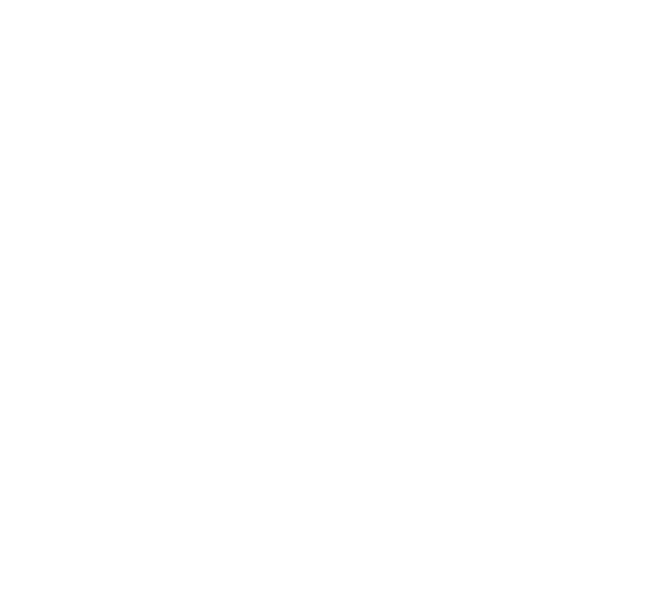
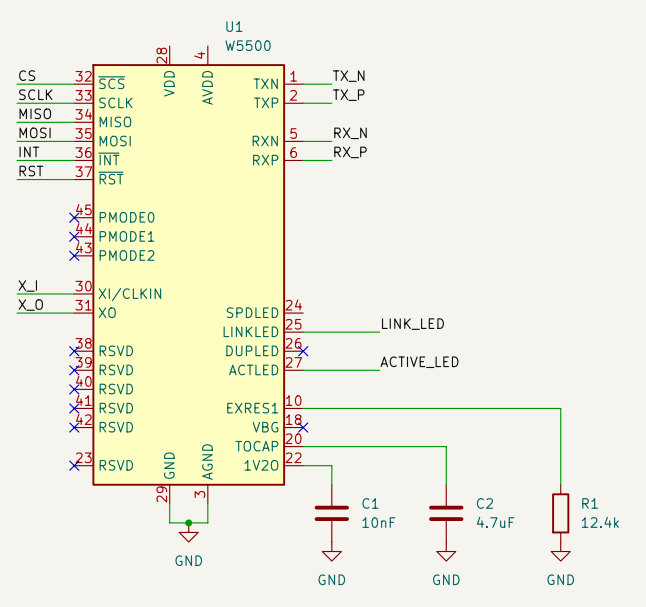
label: none -> CS (27, 75)
label: none -> TX_N (348, 76)
wire: none -> (17, 84) (74, 84)
wire: none -> (303, 84) (331, 84)
label: none -> SCLK (35, 94)
label: none -> TX_P (348, 95)
wire: none -> (17, 103) (74, 103)
wire: none -> (303, 103) (331, 103)
label: none -> MISO (35, 113)
wire: none -> (17, 122) (74, 122)
label: none -> MOSI (35, 132)
label: none -> RX_N (350, 133)
wire: none -> (17, 141) (74, 141)
wire: none -> (303, 141) (331, 141)
label: none -> INT (29, 151)
label: none -> RX_P (350, 152)
wire: none -> (17, 160) (74, 160)
wire: none -> (303, 160) (331, 160)
label: none -> RST (31, 171)
wire: none -> (17, 179) (74, 179)
no-connect mark: none -> (74, 217)
no-connect mark: none -> (74, 236)
no-connect mark: none -> (74, 255)
U1: none -> W5500 (188, 274)
label: none -> X_I (27, 285)
wire: none -> (17, 294) (74, 294)
label: none -> X_O (30, 305)
wire: none -> (17, 313) (74, 313)
label: none -> LINK_LED (412, 324)
wire: none -> (303, 332) (379, 332)
no-connect mark: none -> (74, 351)
no-connect mark: none -> (303, 351)
label: none -> ACTIVE_LED (419, 362)
no-connect mark: none -> (74, 370)
wire: none -> (303, 370) (379, 370)
no-connect mark: none -> (74, 389)
no-connect mark: none -> (74, 408)
wire: none -> (303, 408) (560, 408) (560, 484)
no-connect mark: none -> (74, 427)
no-connect mark: none -> (303, 427)
wire: none -> (303, 446) (446, 446) (446, 484)
no-connect mark: none -> (74, 465)
wire: none -> (303, 465) (331, 465) (331, 484)
wire: none -> (169, 503) (169, 522) (207, 522) (207, 503)
C1: none -> 10nF (331, 513)
C2: none -> 4.7uF (446, 513)
R1: none -> 12.4k (560, 513)
junction: none -> (188, 522)
power symbol: none -> GND (188, 532)
power symbol: none -> GND (331, 551)
power symbol: none -> GND (446, 551)
power symbol: none -> GND (560, 551)

